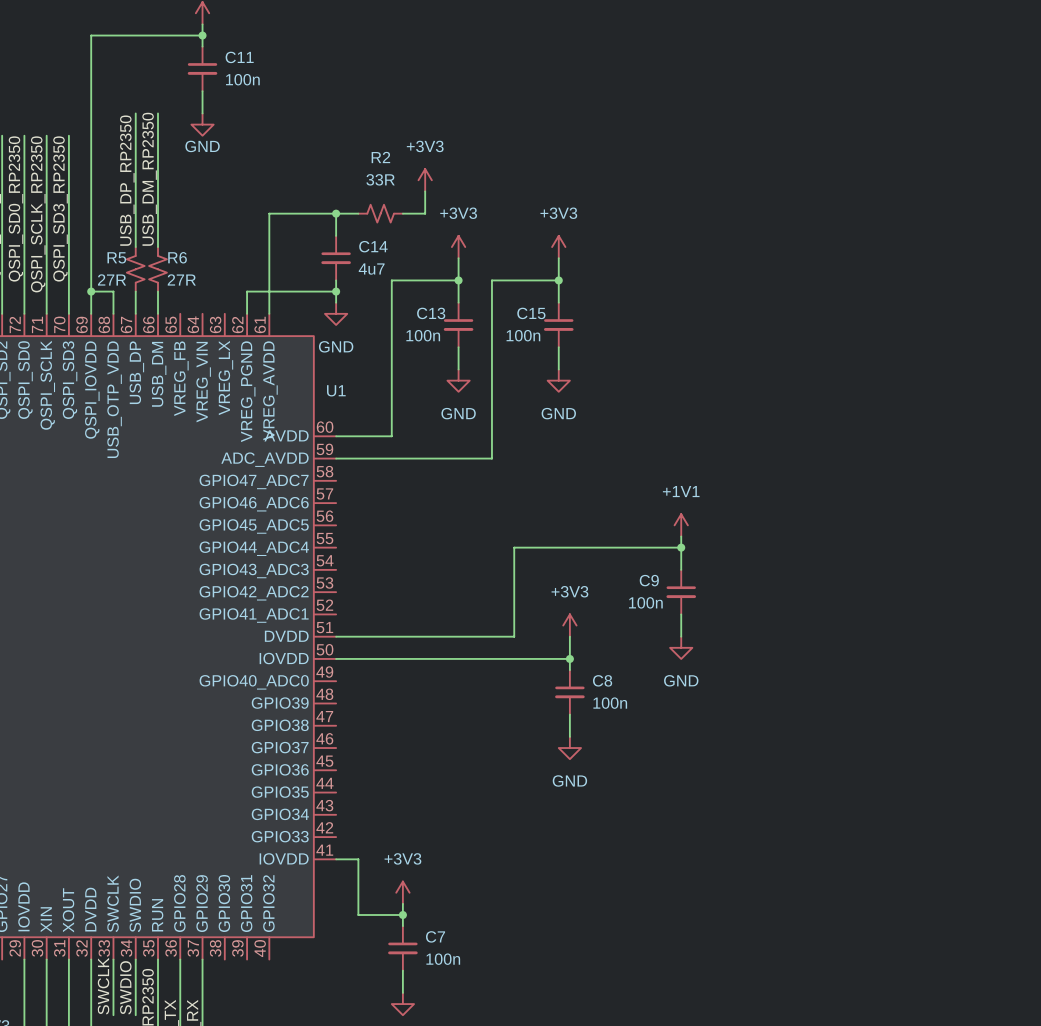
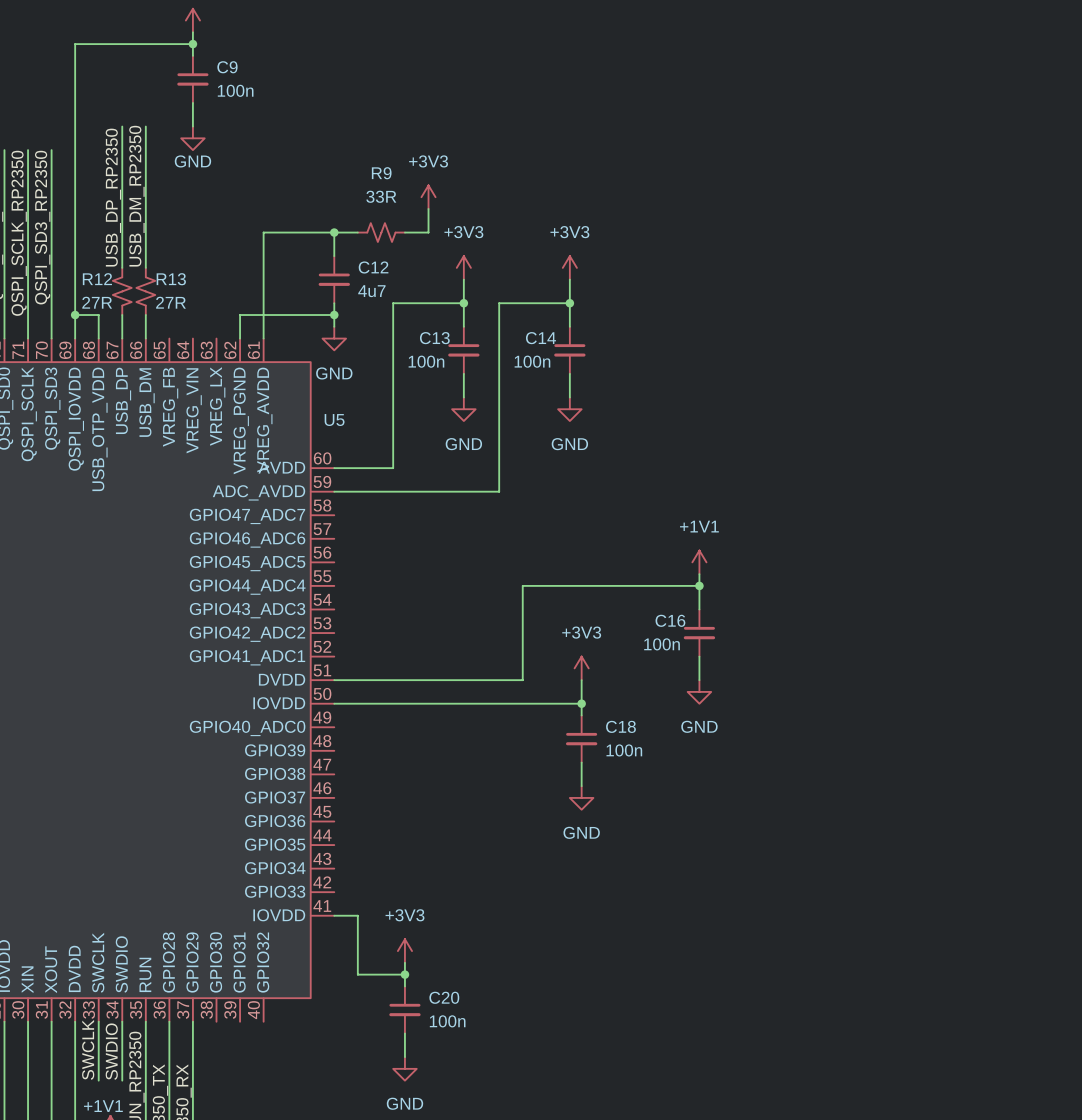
C11 name: C11 (239, 57) -> C9 (227, 67)
R2 name: R2 (380, 157) -> R9 (381, 173)
C14 name: C14 (373, 246) -> C12 (373, 267)
R5 name: R5 (116, 257) -> R12 (97, 279)
R6 name: R6 (177, 257) -> R13 (171, 279)
C15 name: C15 (531, 313) -> C14 (540, 338)
U1 name: U1 (336, 390) -> U5 (334, 420)
C9 name: C9 (649, 580) -> C16 (670, 620)
C8 name: C8 (602, 680) -> C18 (620, 726)
C7 name: C7 (435, 936) -> C20 (444, 997)

